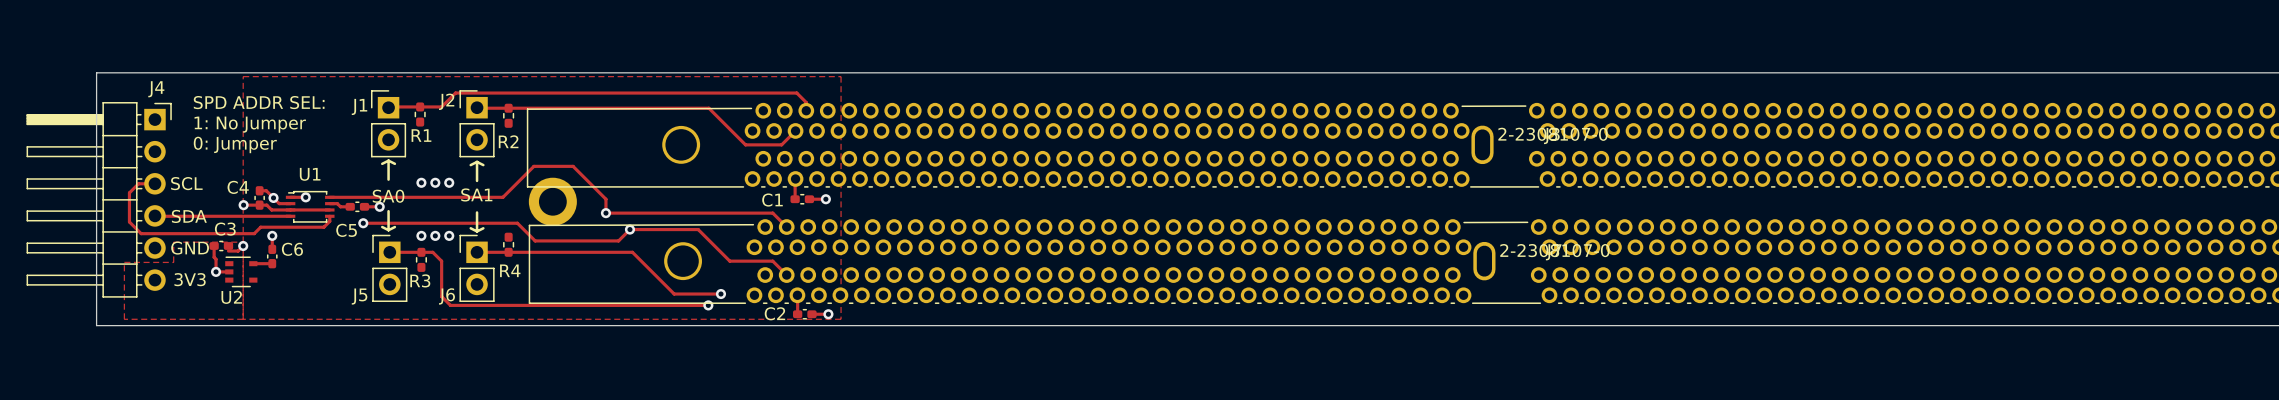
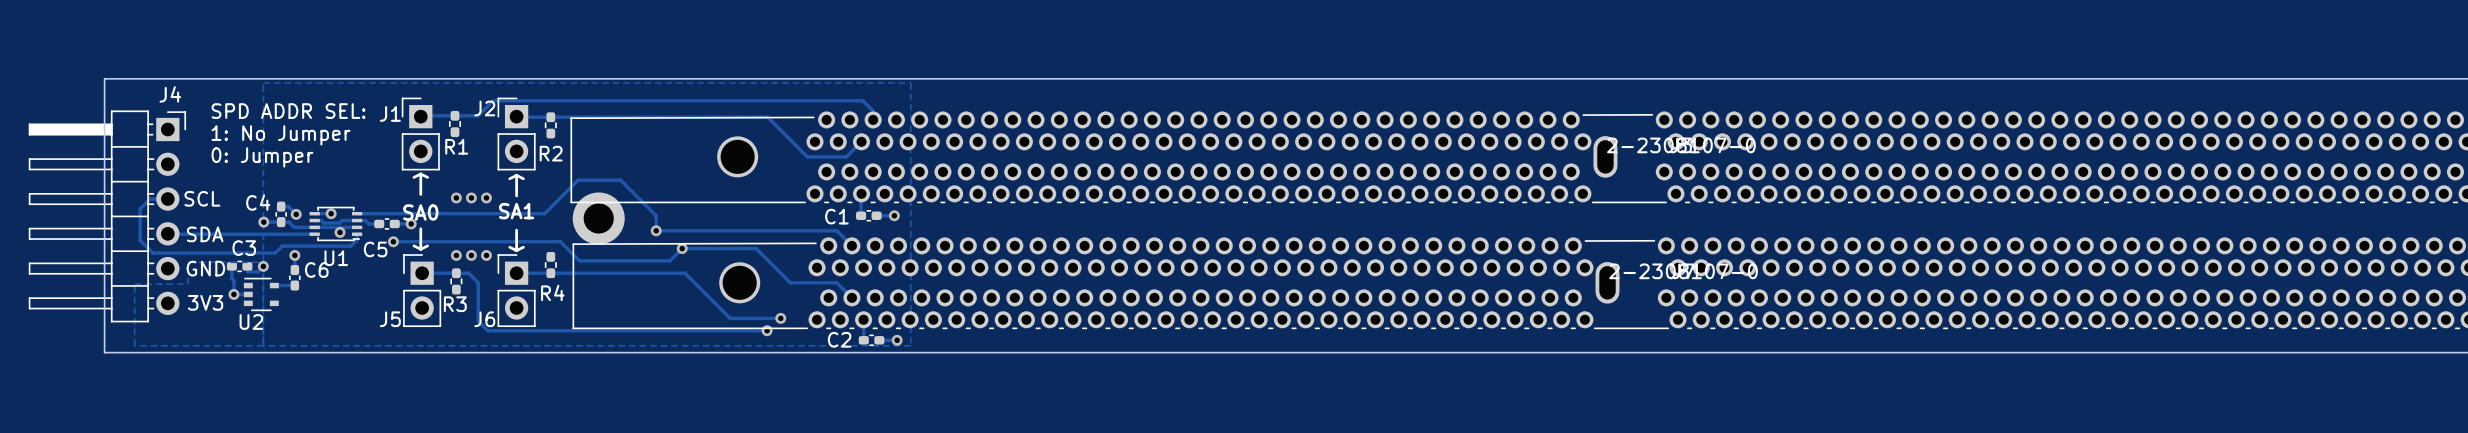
track: (273, 197) (279, 203) (290, 203) -> (357, 220) (342, 220) (339, 223) (323, 223) (321, 220) (314, 220)
U1 rotation: 0° (310, 206) -> 180° (335, 223)
via: none -> (340, 232)

